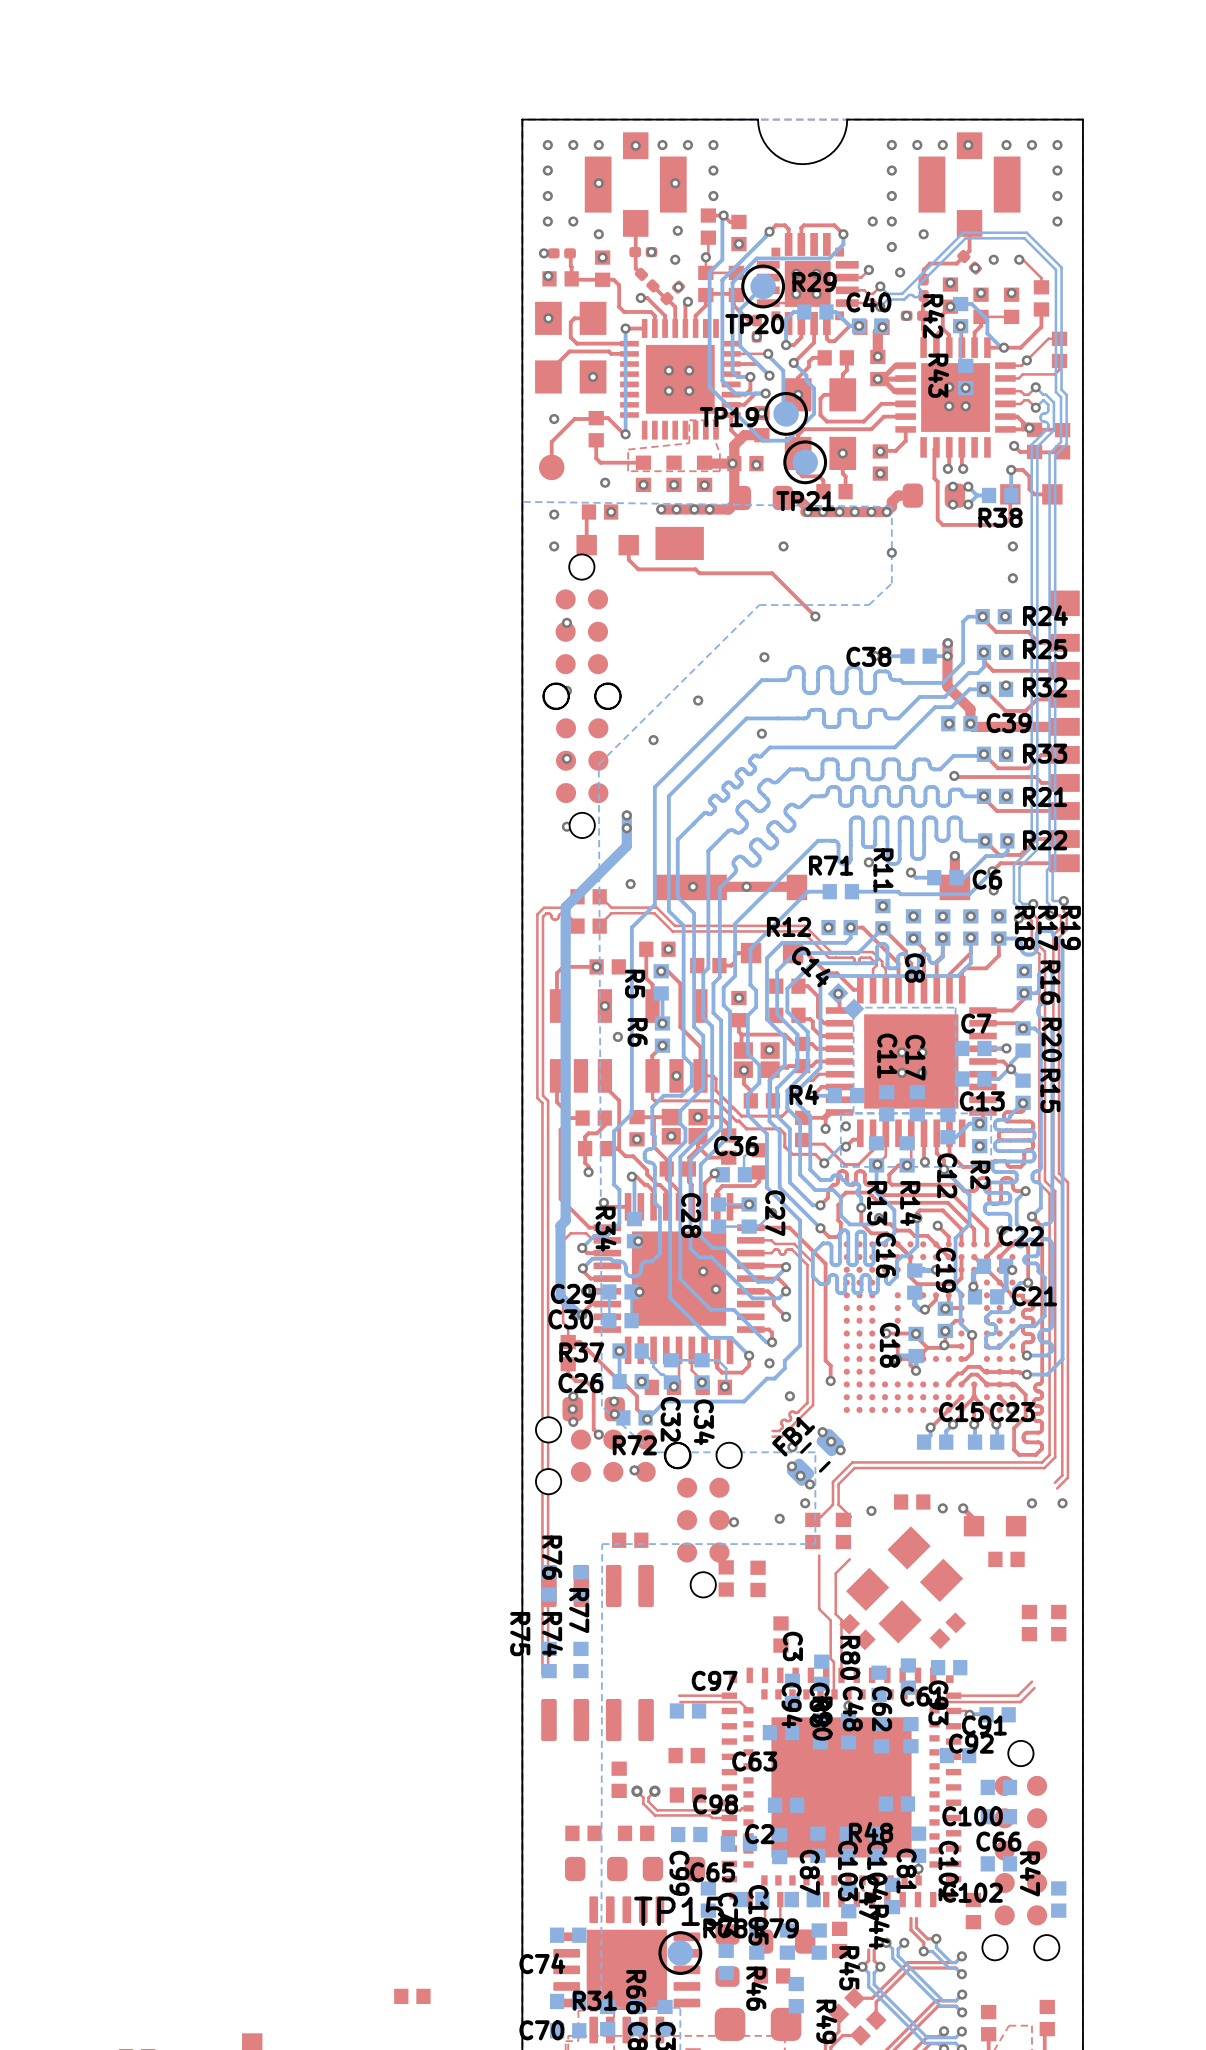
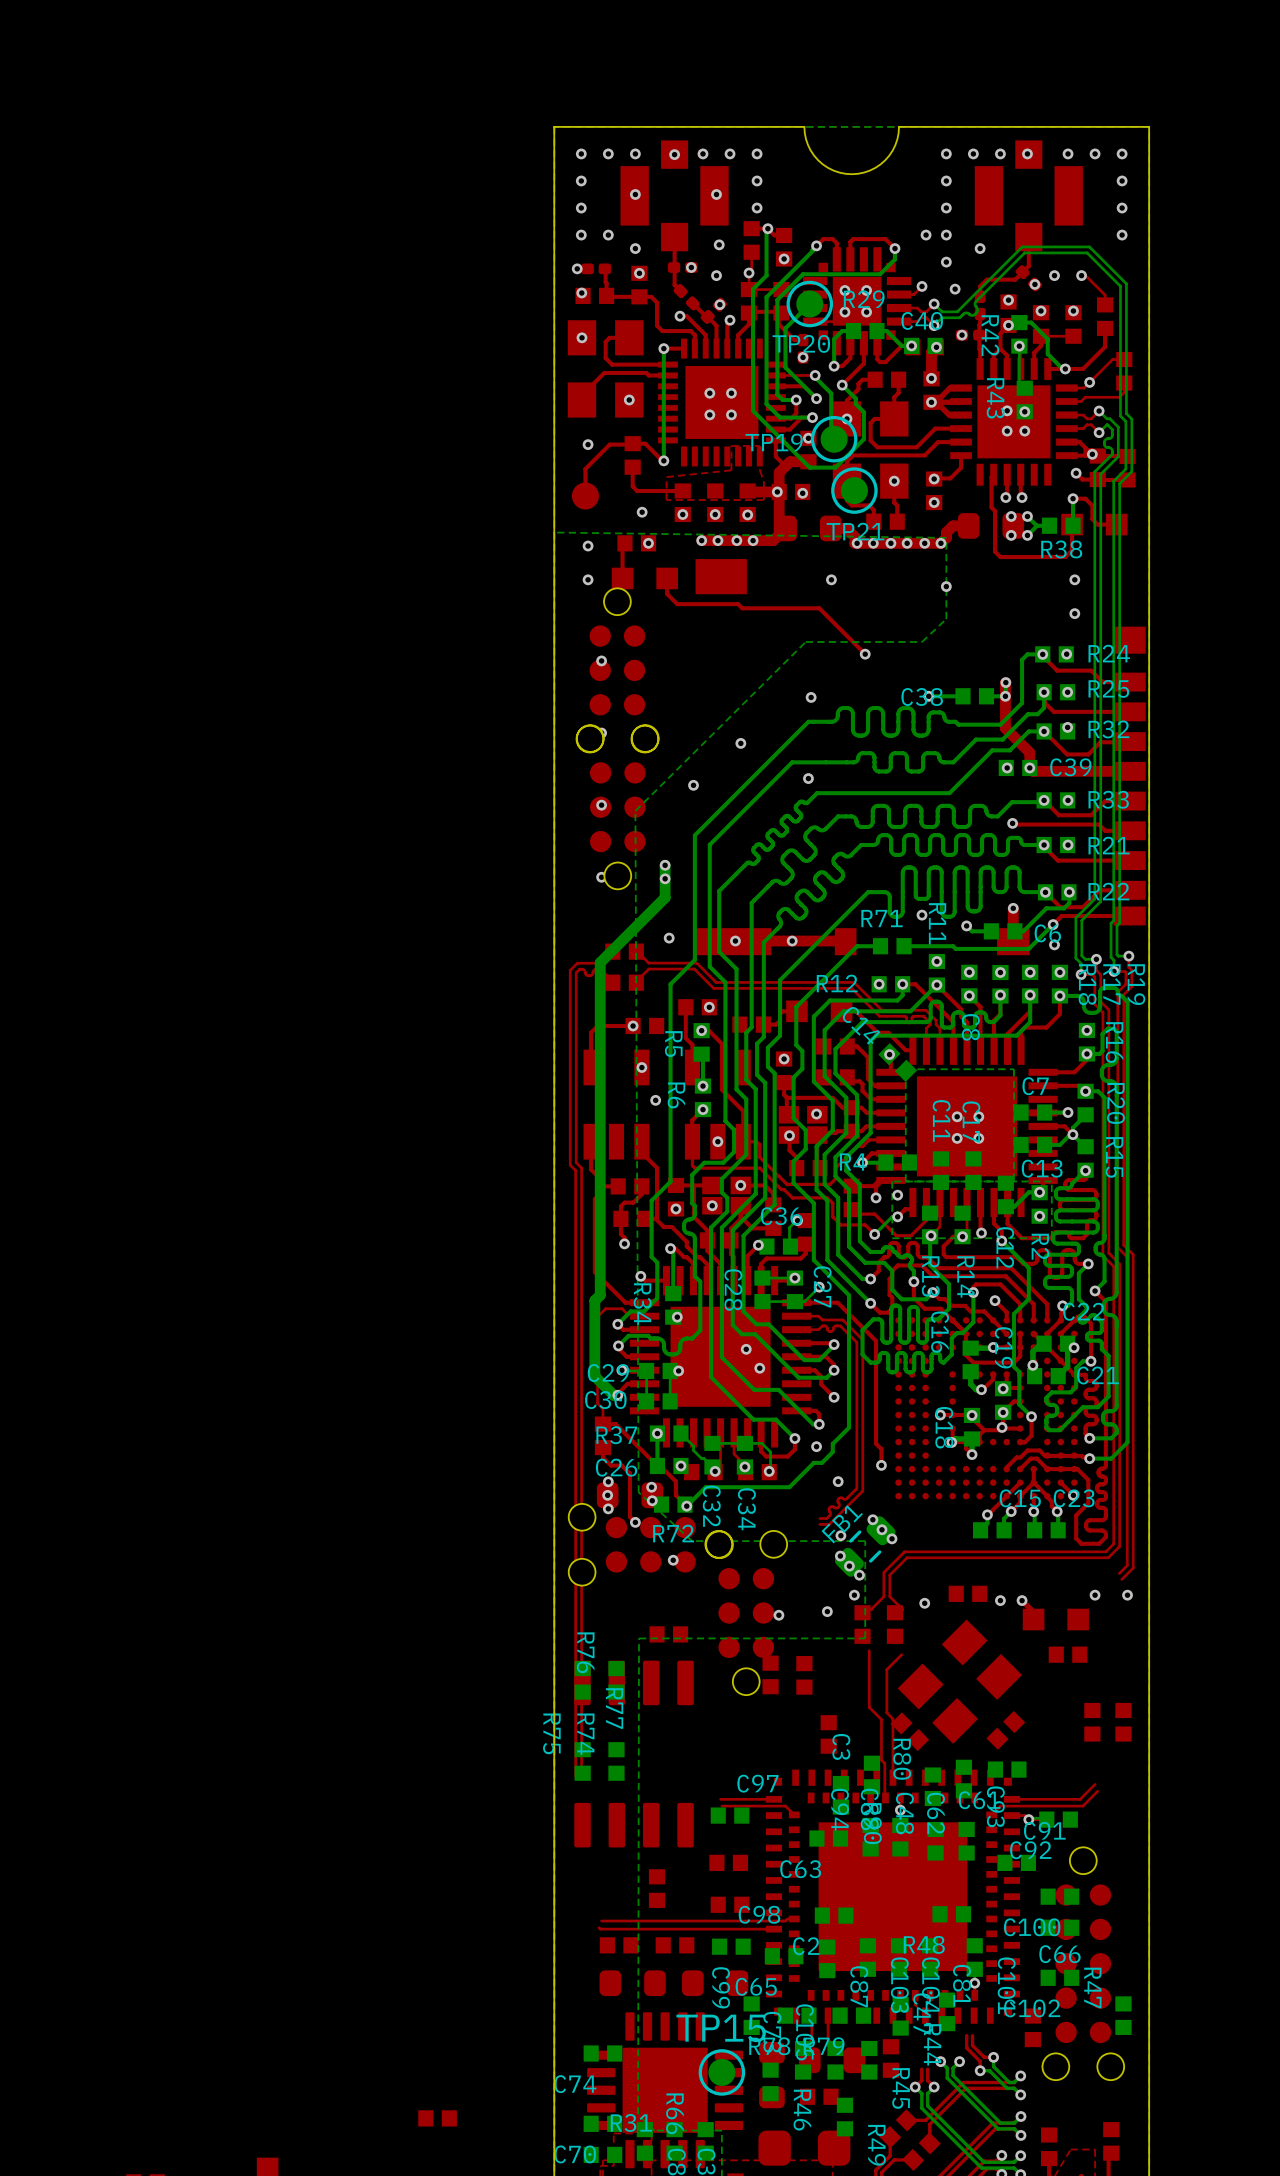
top track: (637, 1791) (643, 1797) (643, 1803) (655, 1815) (709, 1815) (712, 1817) -> (598, 1927) (755, 1929)
via: (637, 1791) -> none
top track: (654, 1791) (648, 1797) (648, 1801) (657, 1810) -> (601, 1921) (697, 1921)
via: (654, 1791) -> none

